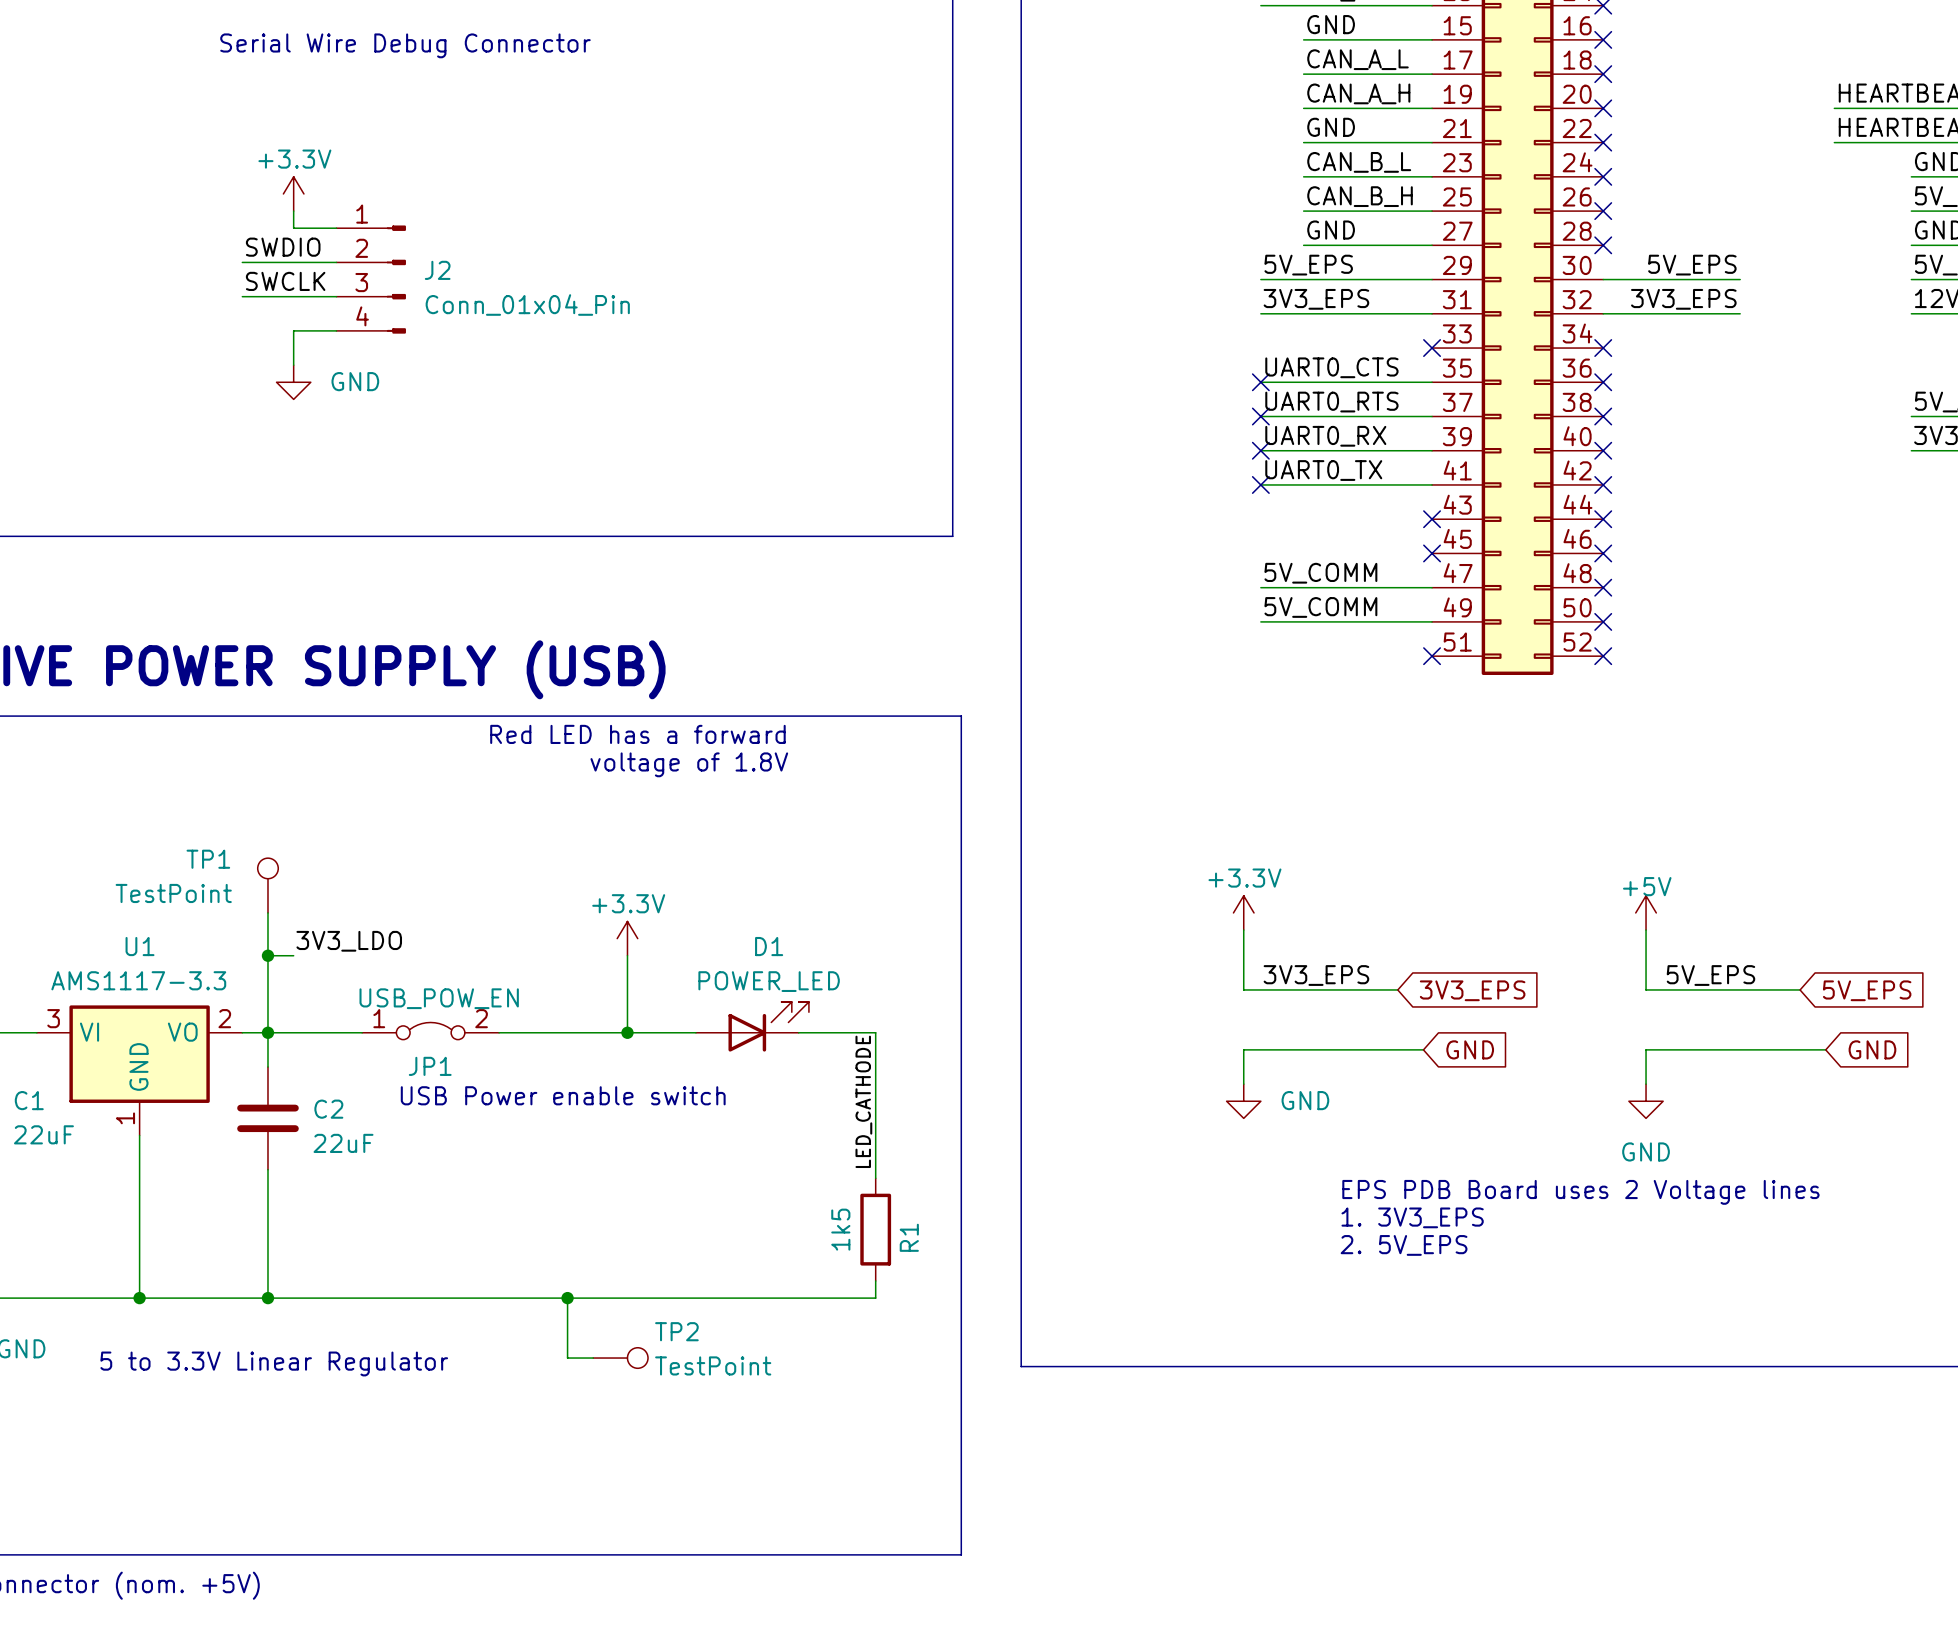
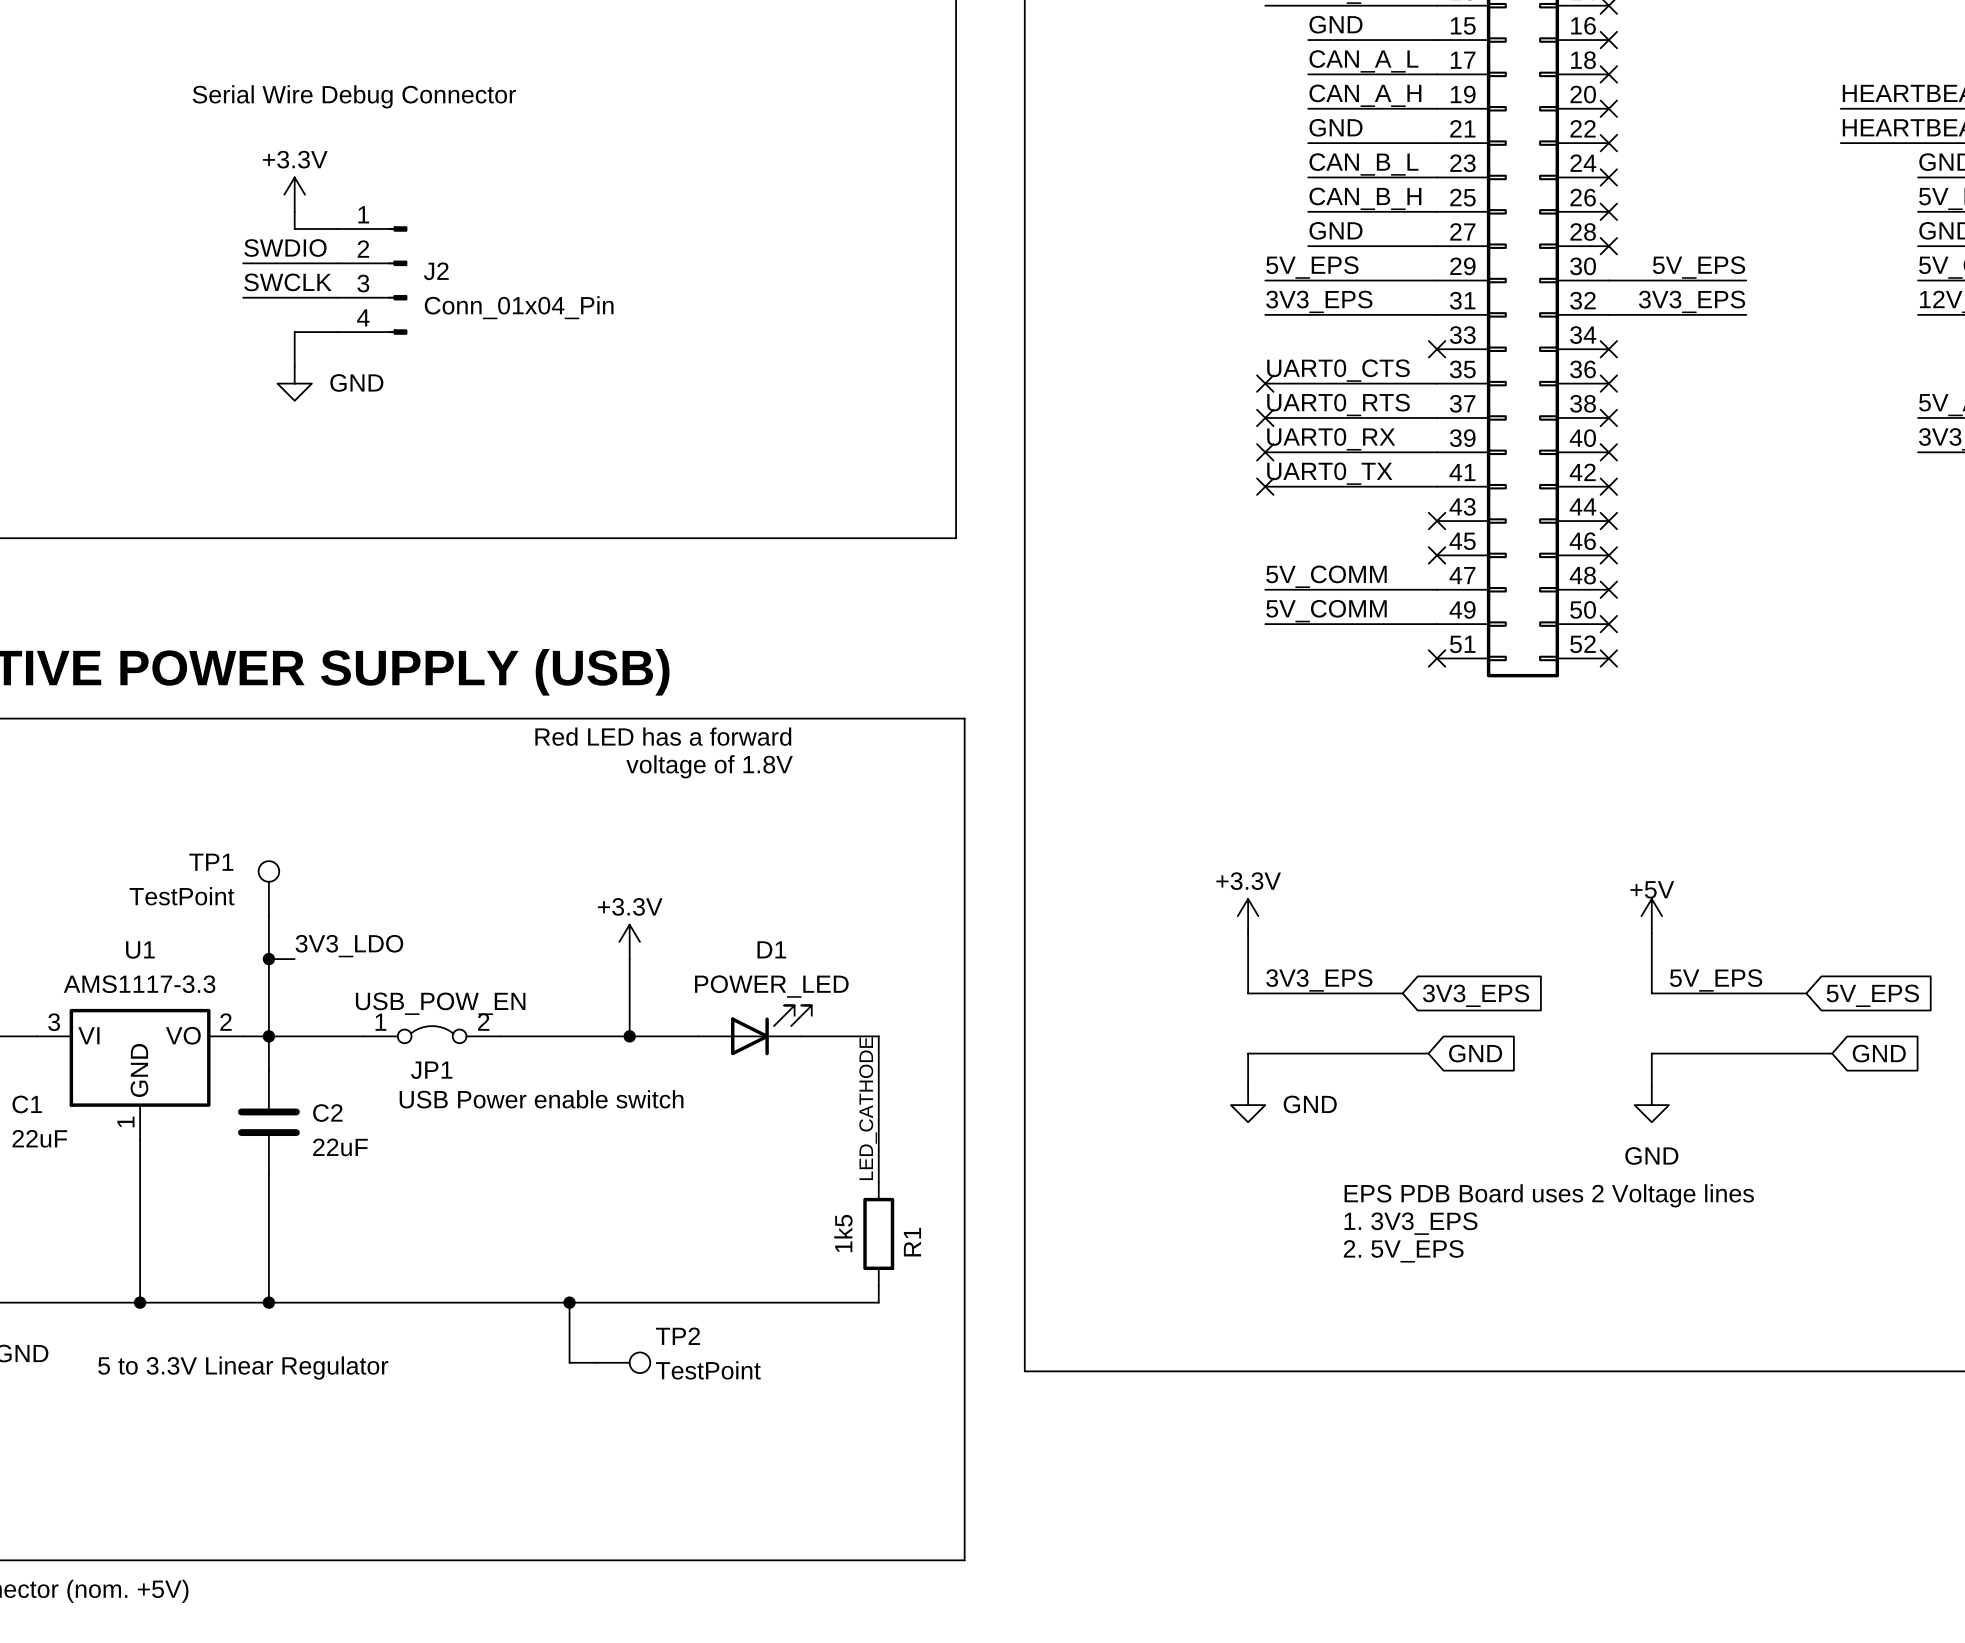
text position: Serial Wire Debug Connector (405, 45) -> Serial Wire Debug Connector (354, 96)

